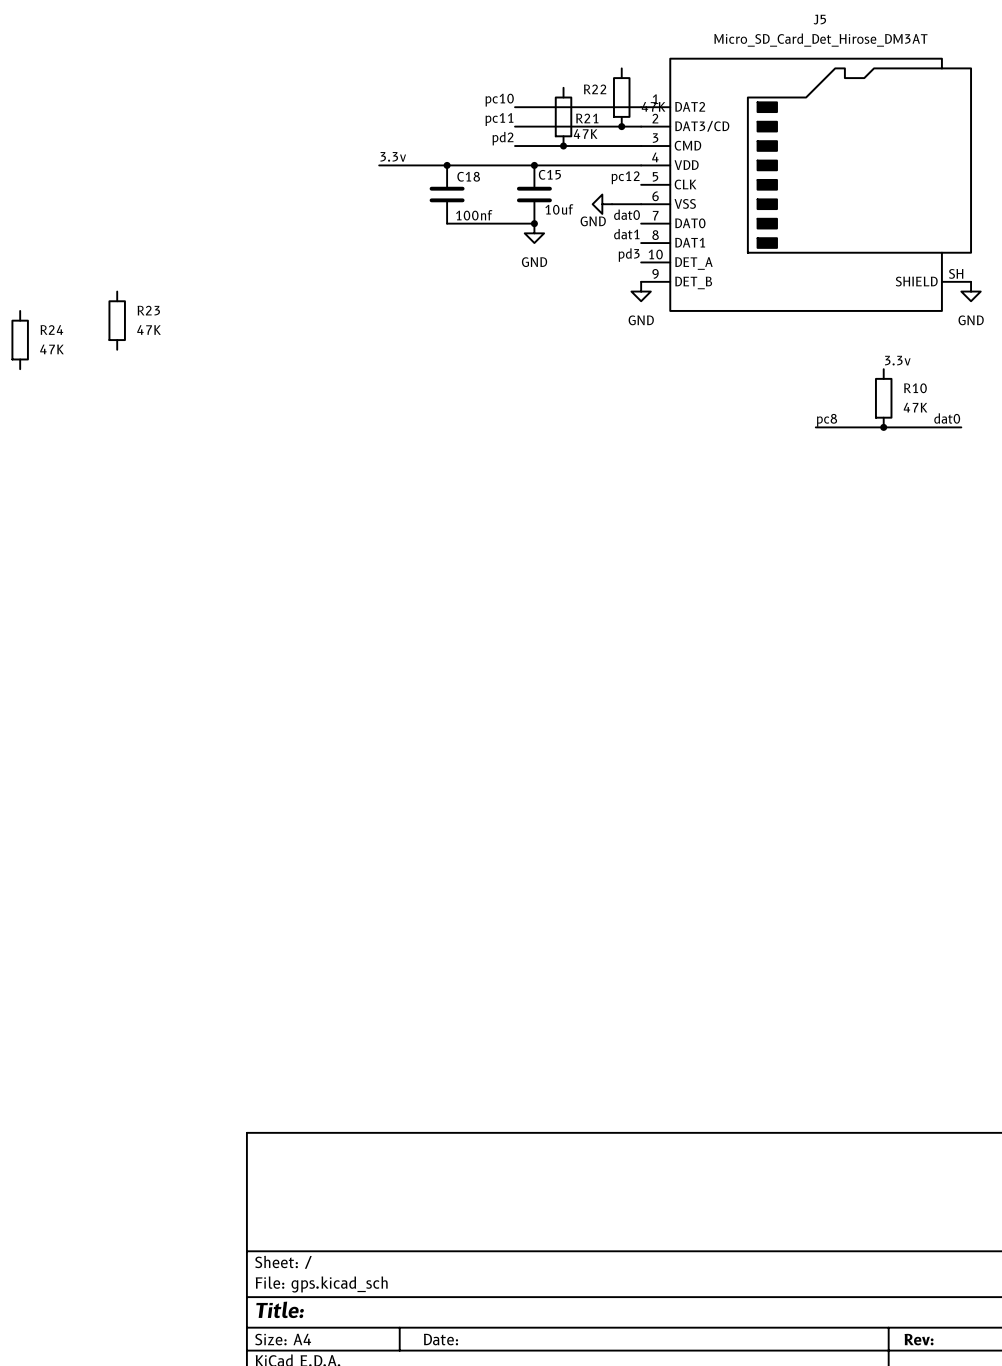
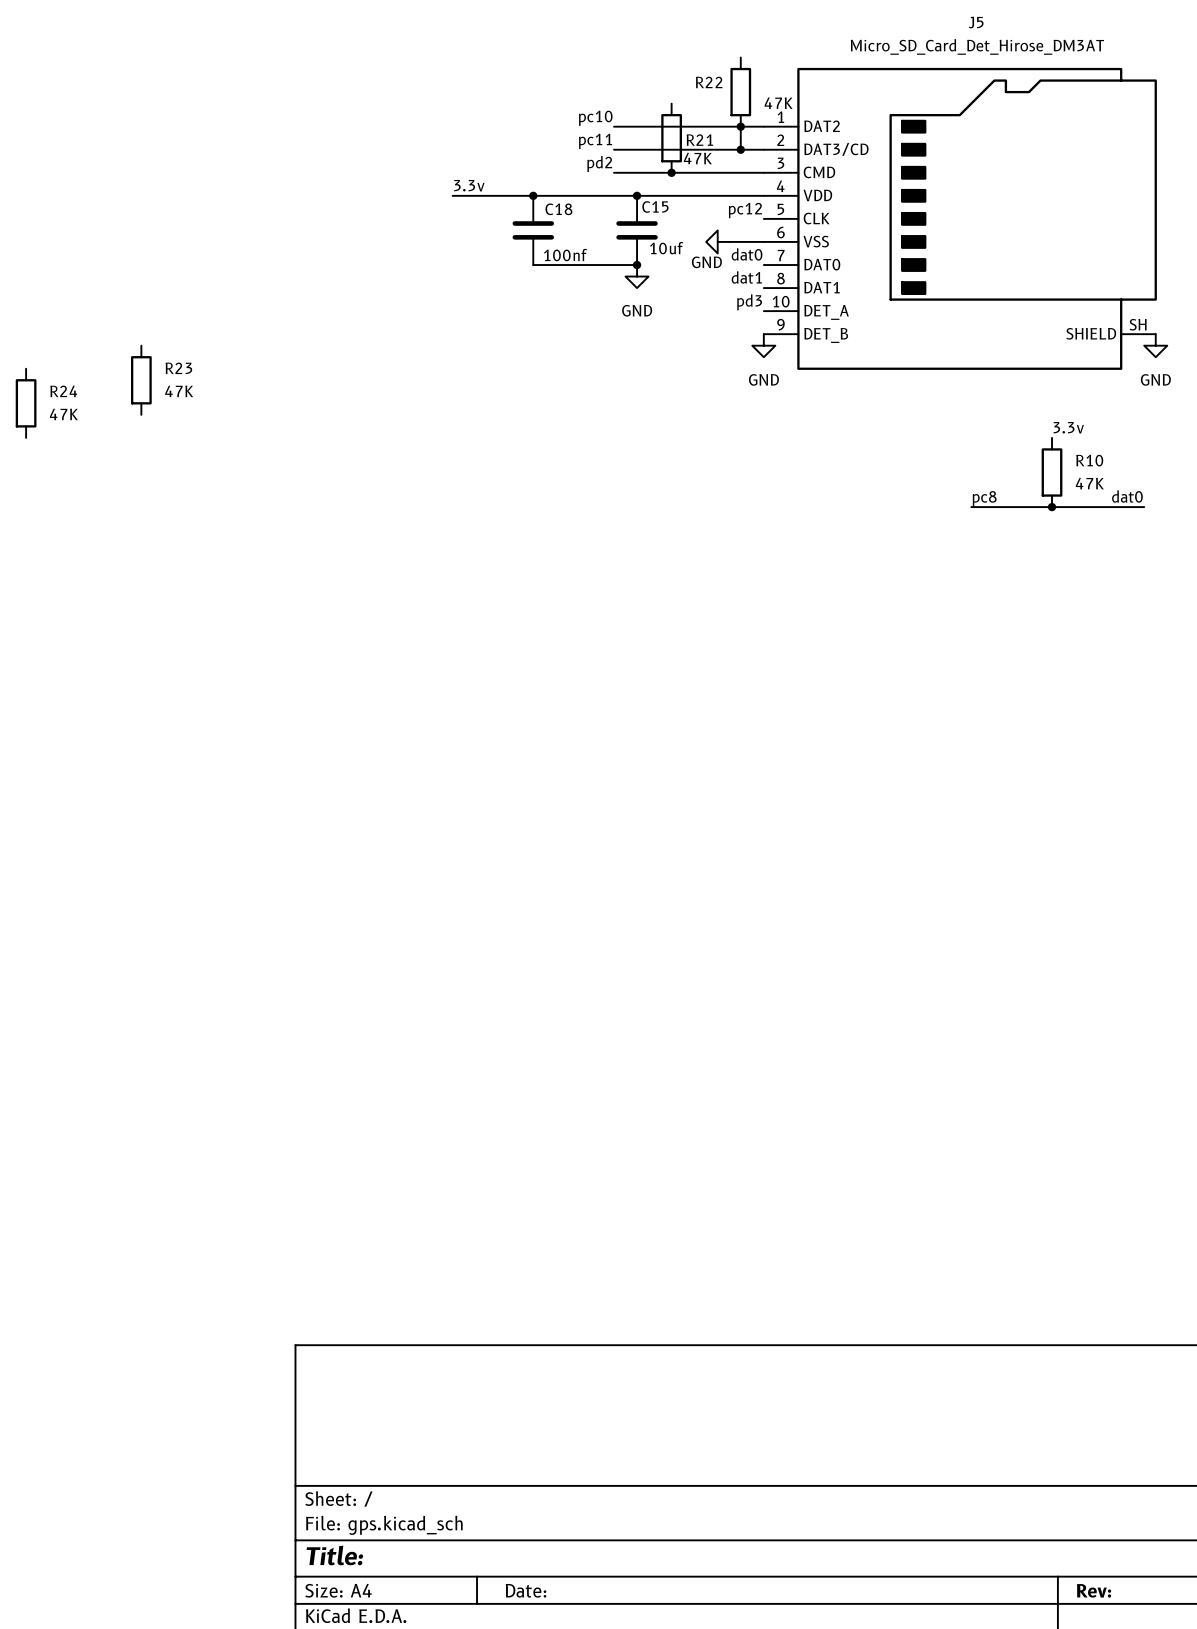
R22 position: (621, 97) -> (740, 92)
junction: none -> (740, 126)

